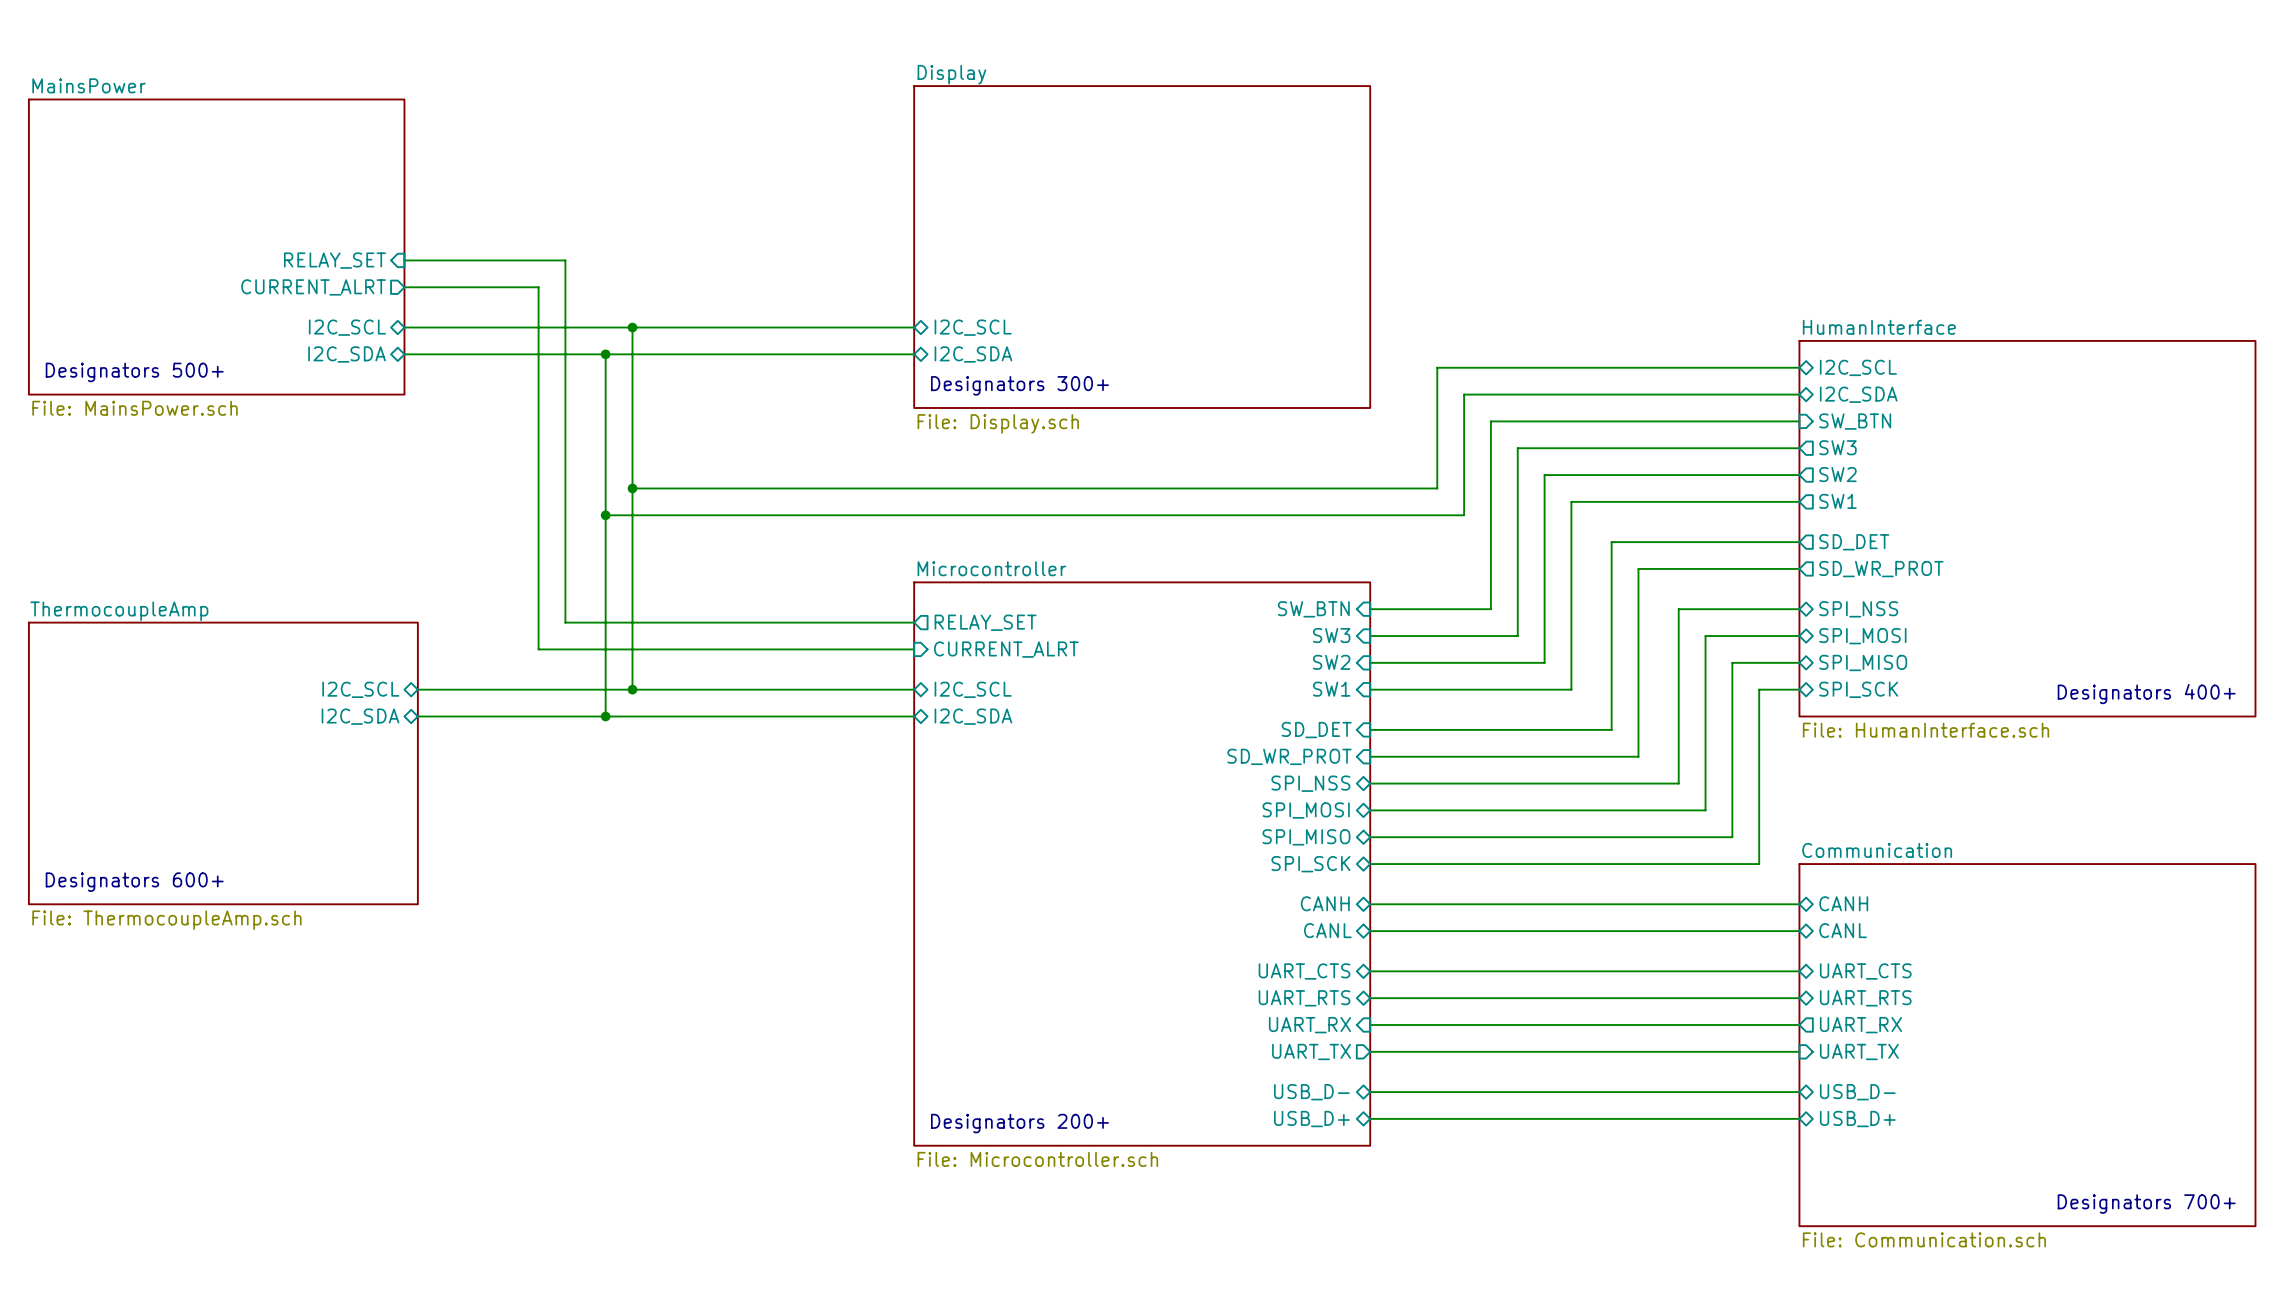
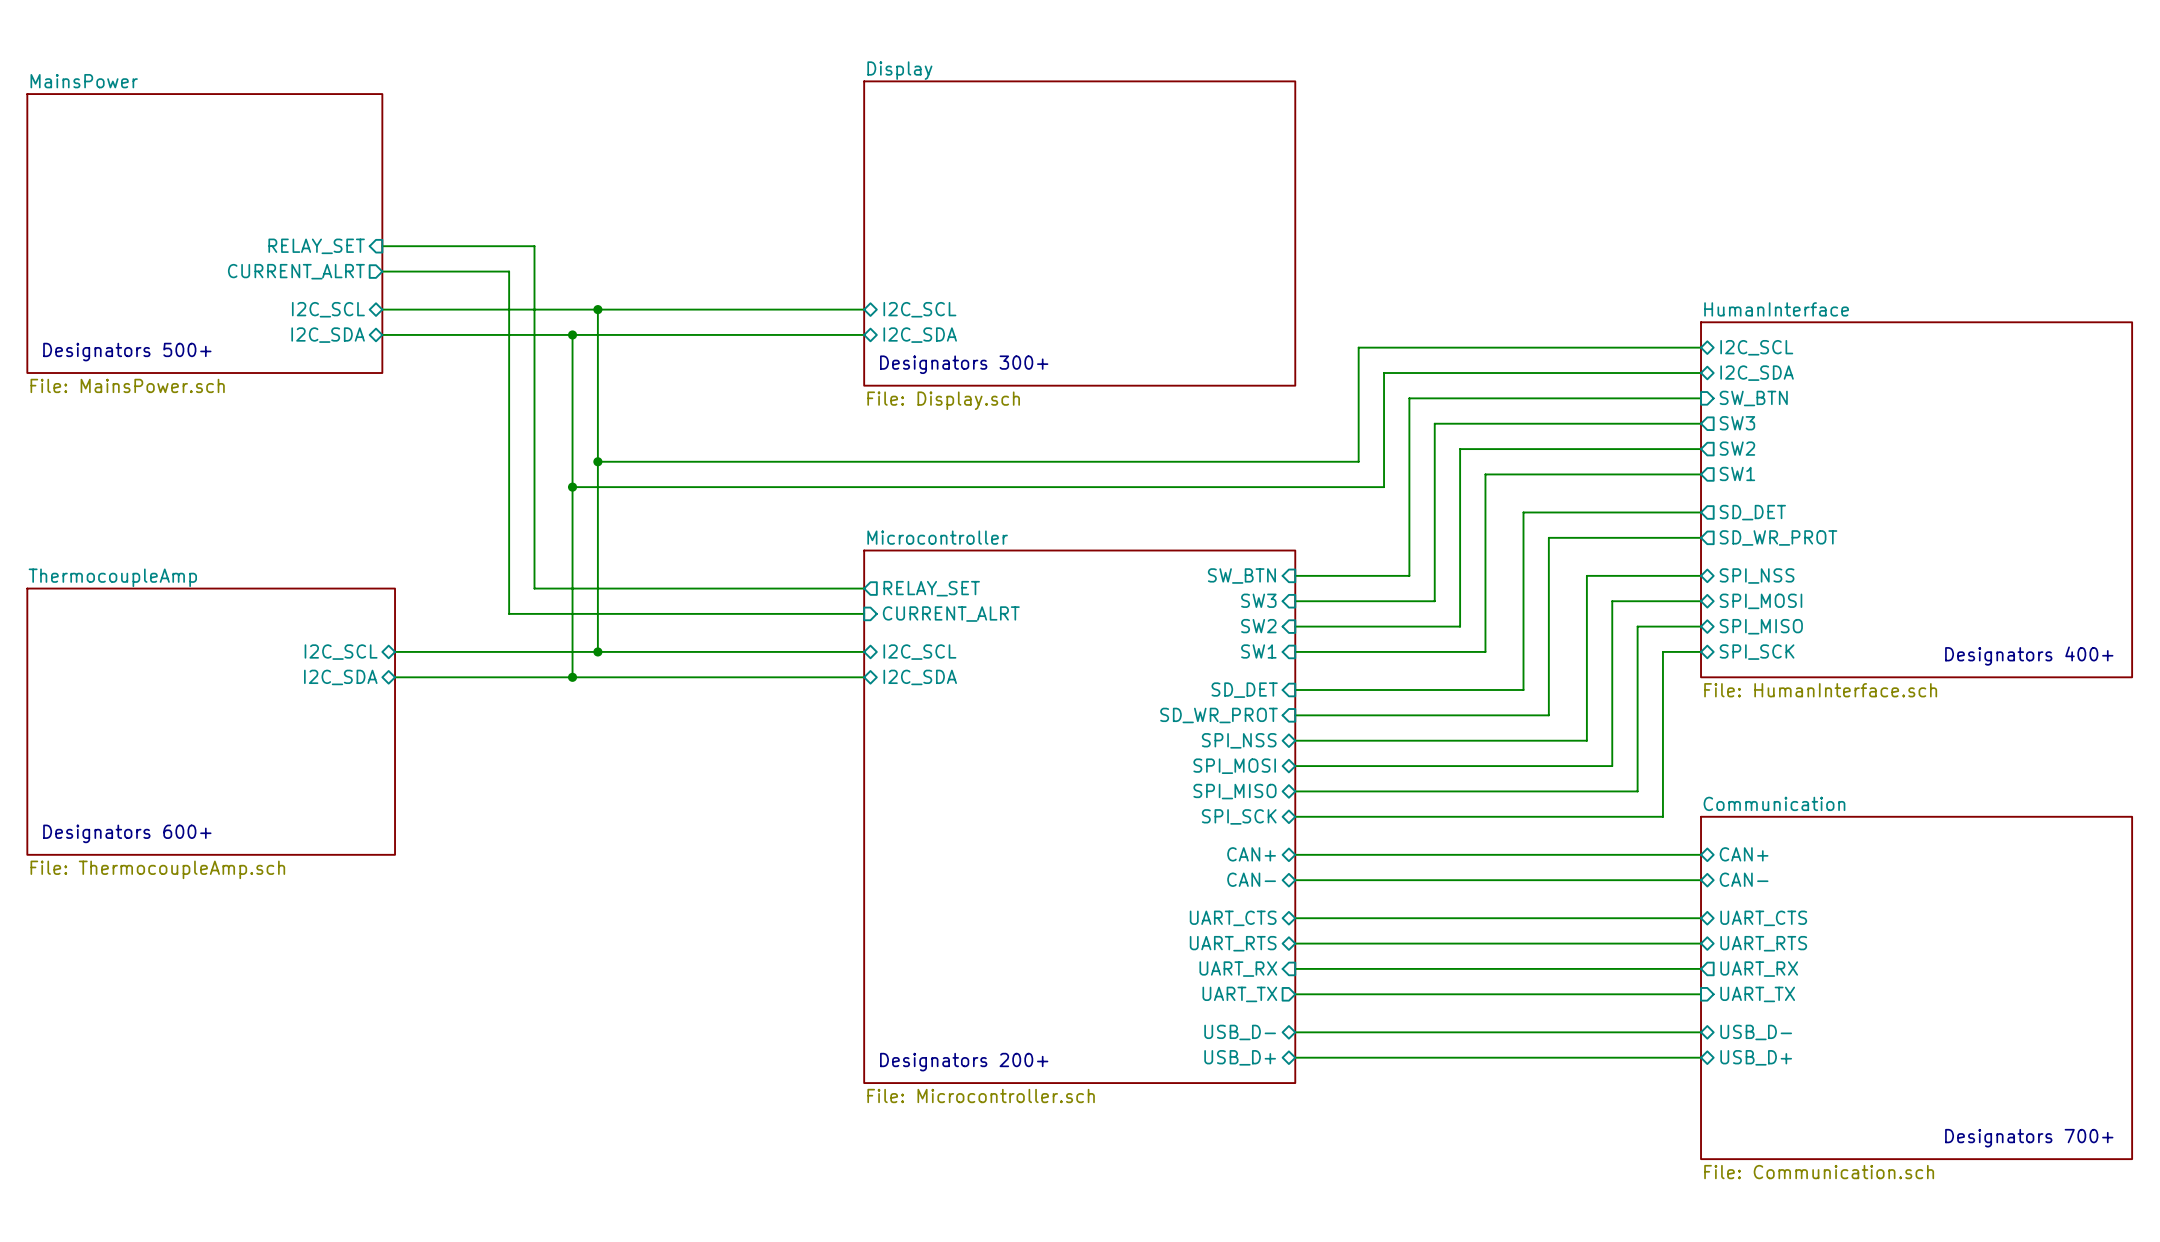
sheet pin: CANH (1325, 903) -> CAN+ (1251, 854)
sheet pin: CANH (1843, 903) -> CAN+ (1744, 854)
sheet pin: CANL (1327, 930) -> CAN- (1251, 879)
sheet pin: CANL (1843, 930) -> CAN- (1744, 879)

